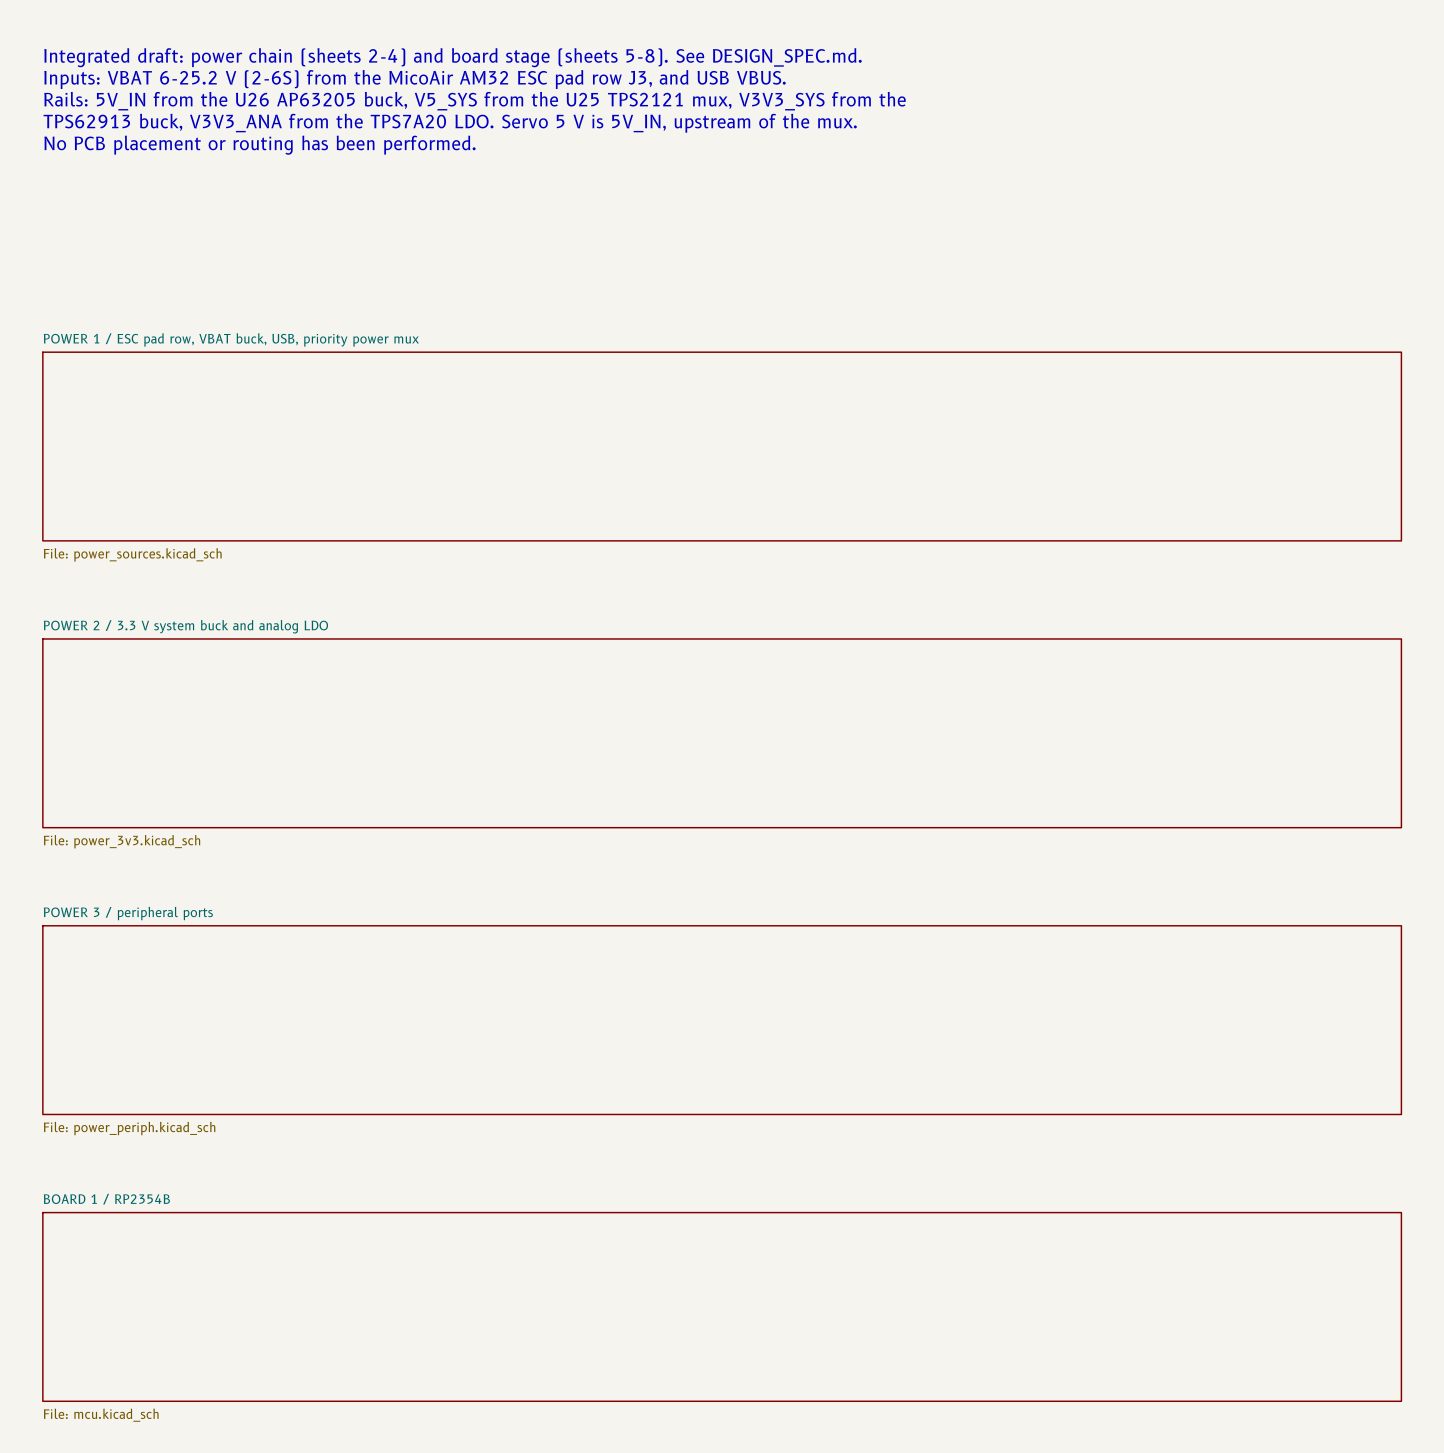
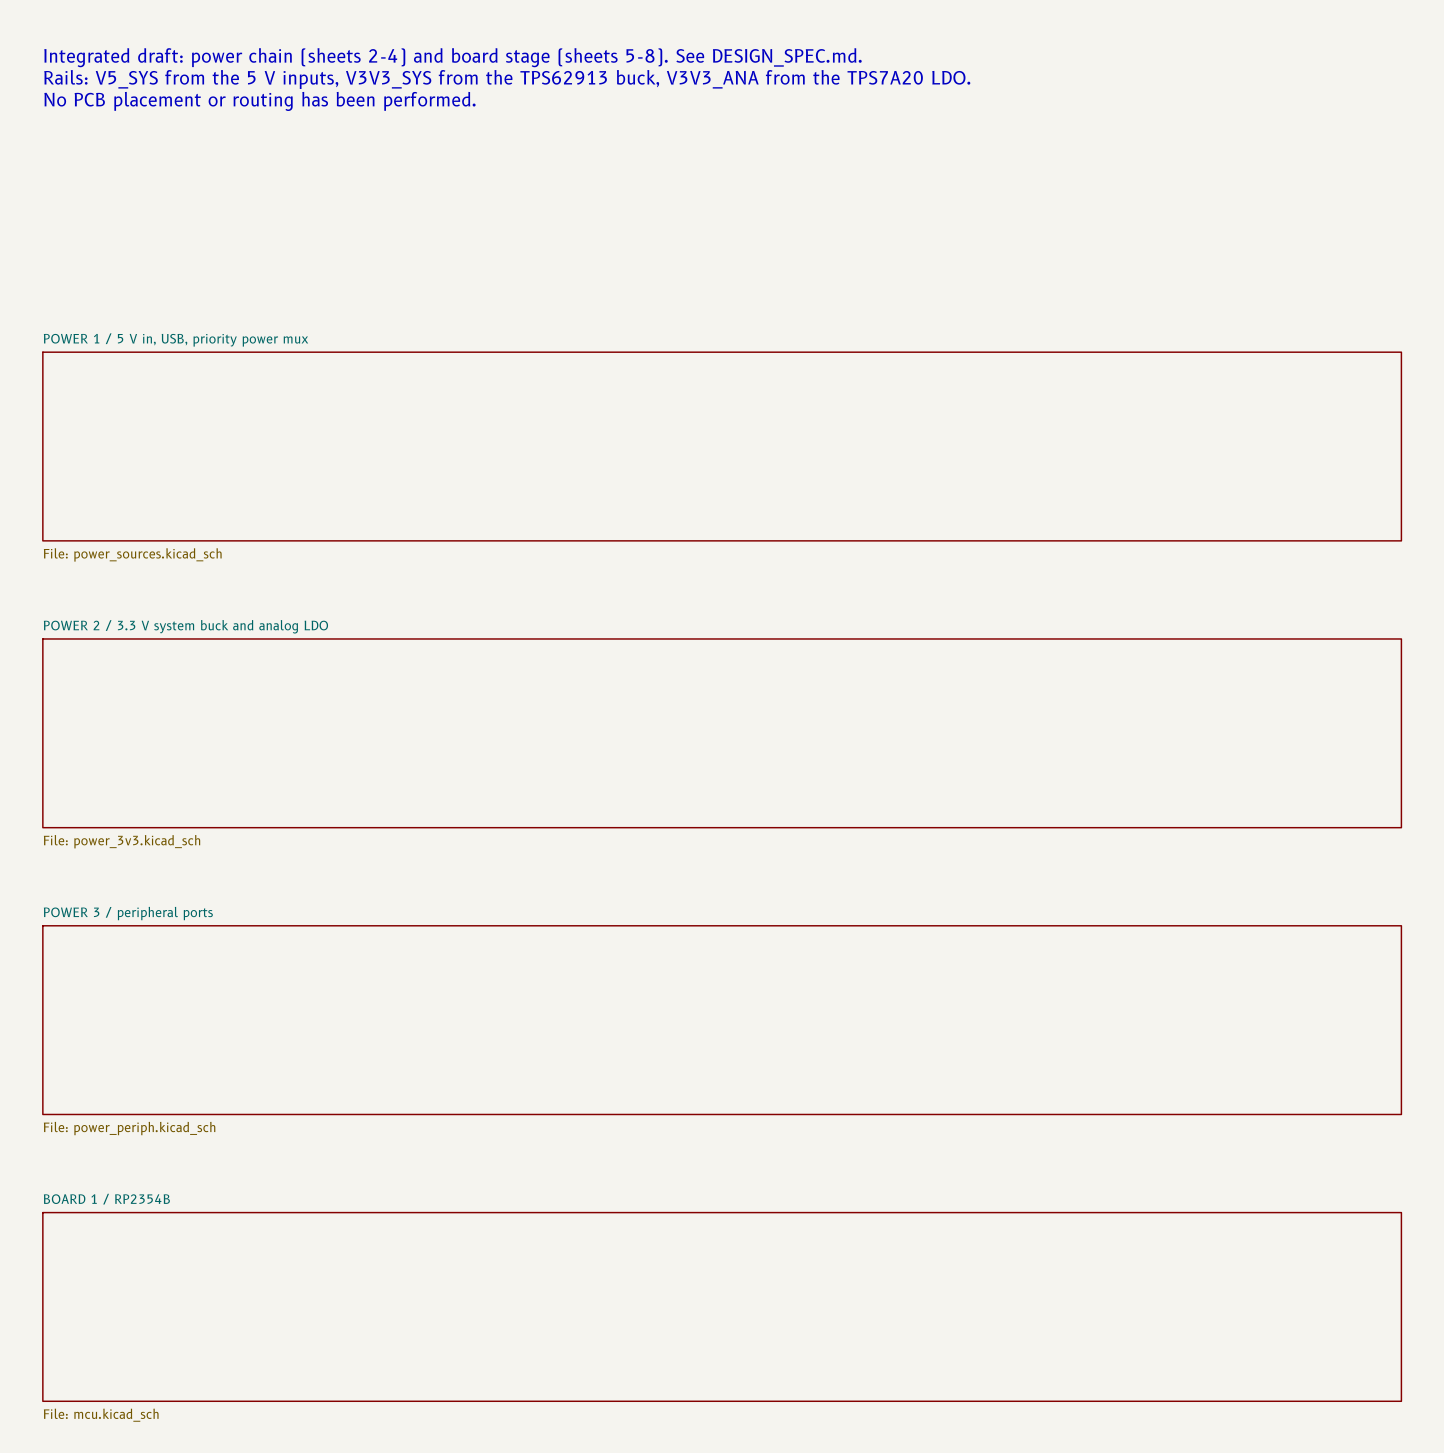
text: Inputs: VBAT 6-25.2 V (2-6S) from the MicoAir AM32 ESC pad row J3, and USB VBUS. (415, 79) -> Rails: V5_SYS from the 5 V inputs, V3V3_SYS from the TPS62913 buck, V3V3_ANA from the TPS7A20 LDO. (507, 79)
text: Rails: 5V_IN from the U26 AP63205 buck, V5_SYS from the U25 TPS2121 mux, V3V3_SYS from the (474, 101) -> No PCB placement or routing has been performed. (259, 101)
text: TPS62913 buck, V3V3_ANA from the TPS7A20 LDO. Servo 5 V is 5V_IN, upstream of the mux. (450, 123) -> none
text: No PCB placement or routing has been performed. (259, 145) -> none
sheet POWER 1 / ESC pad row, VBAT buck, USB, priority power mux name: POWER 1 / ESC pad row, VBAT buck, USB, priority power mux (231, 339) -> POWER 1 / 5 V in, USB, priority power mux (176, 339)

